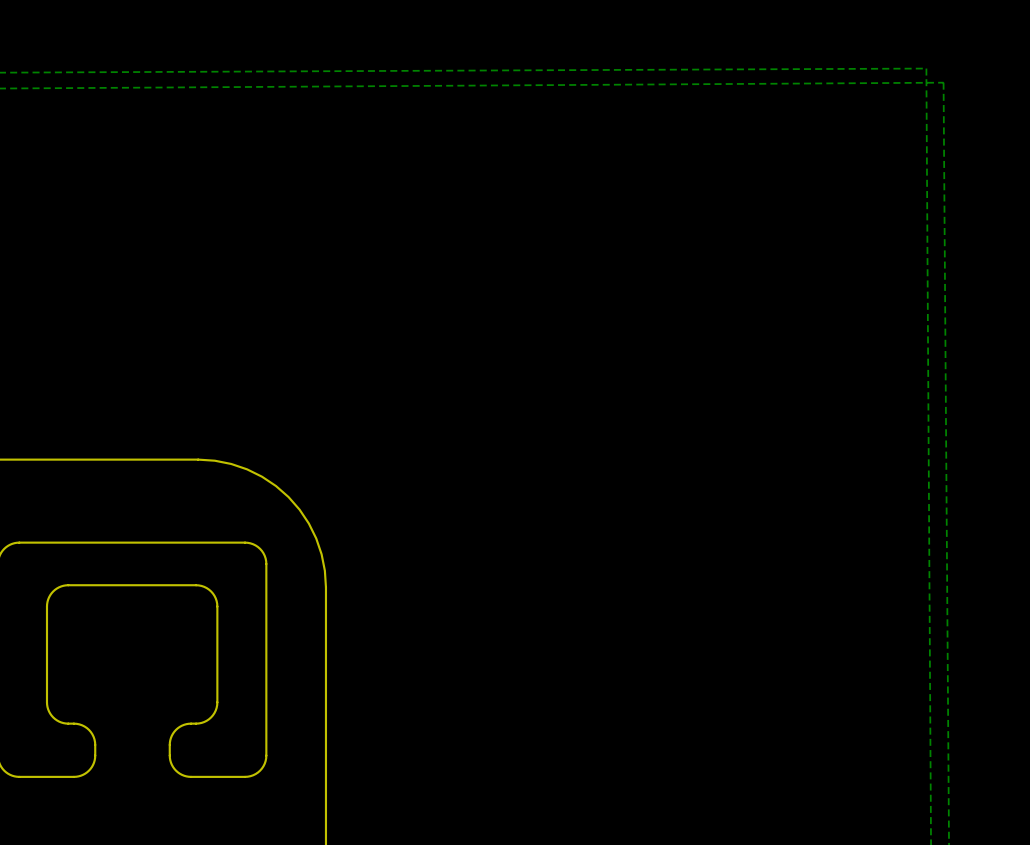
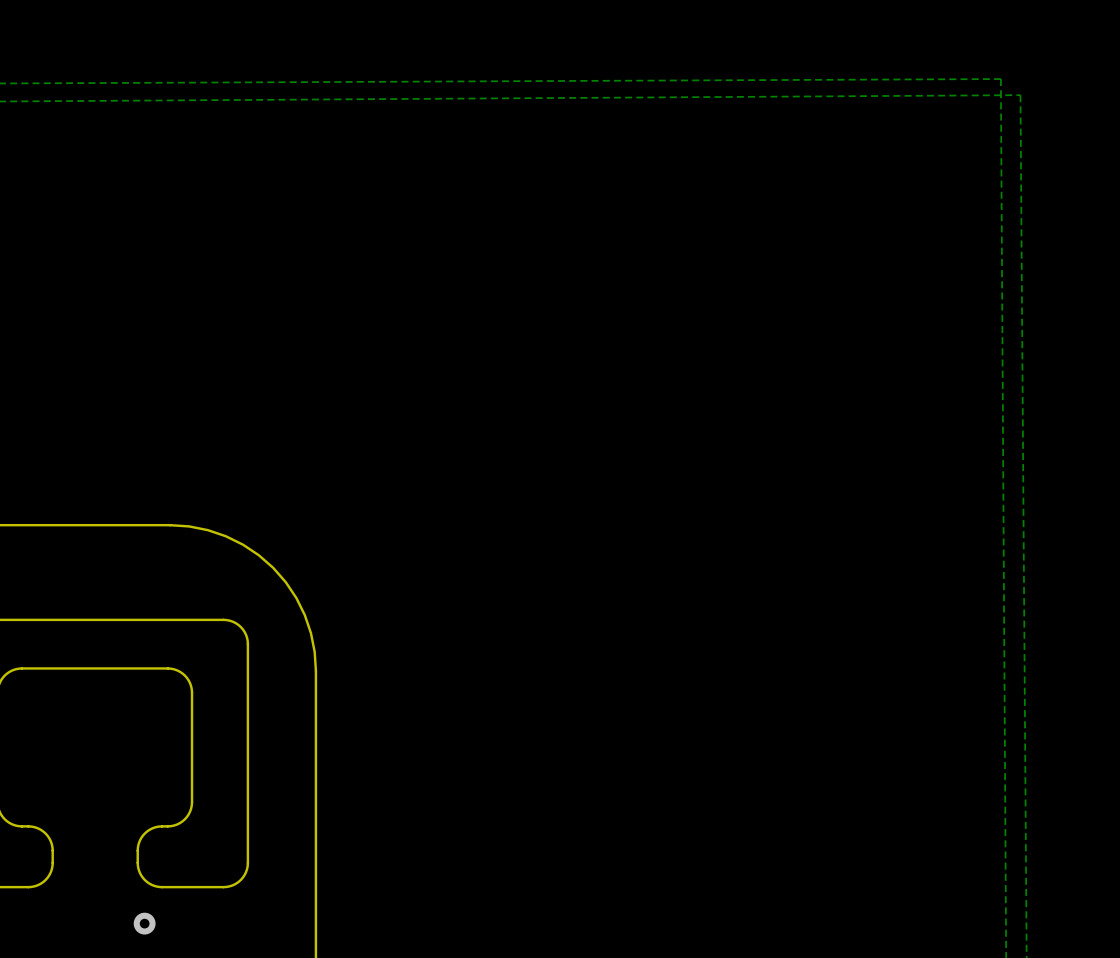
via: none -> (144, 923)

